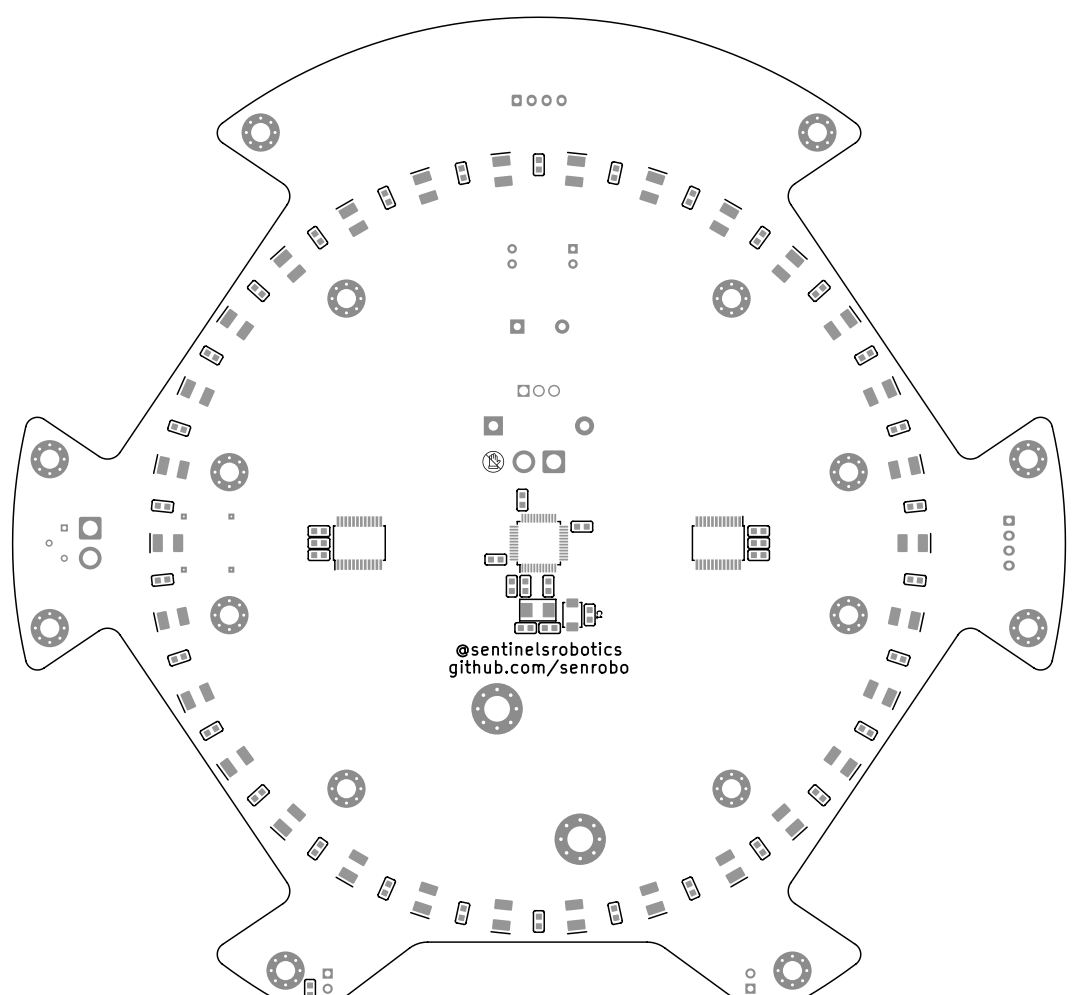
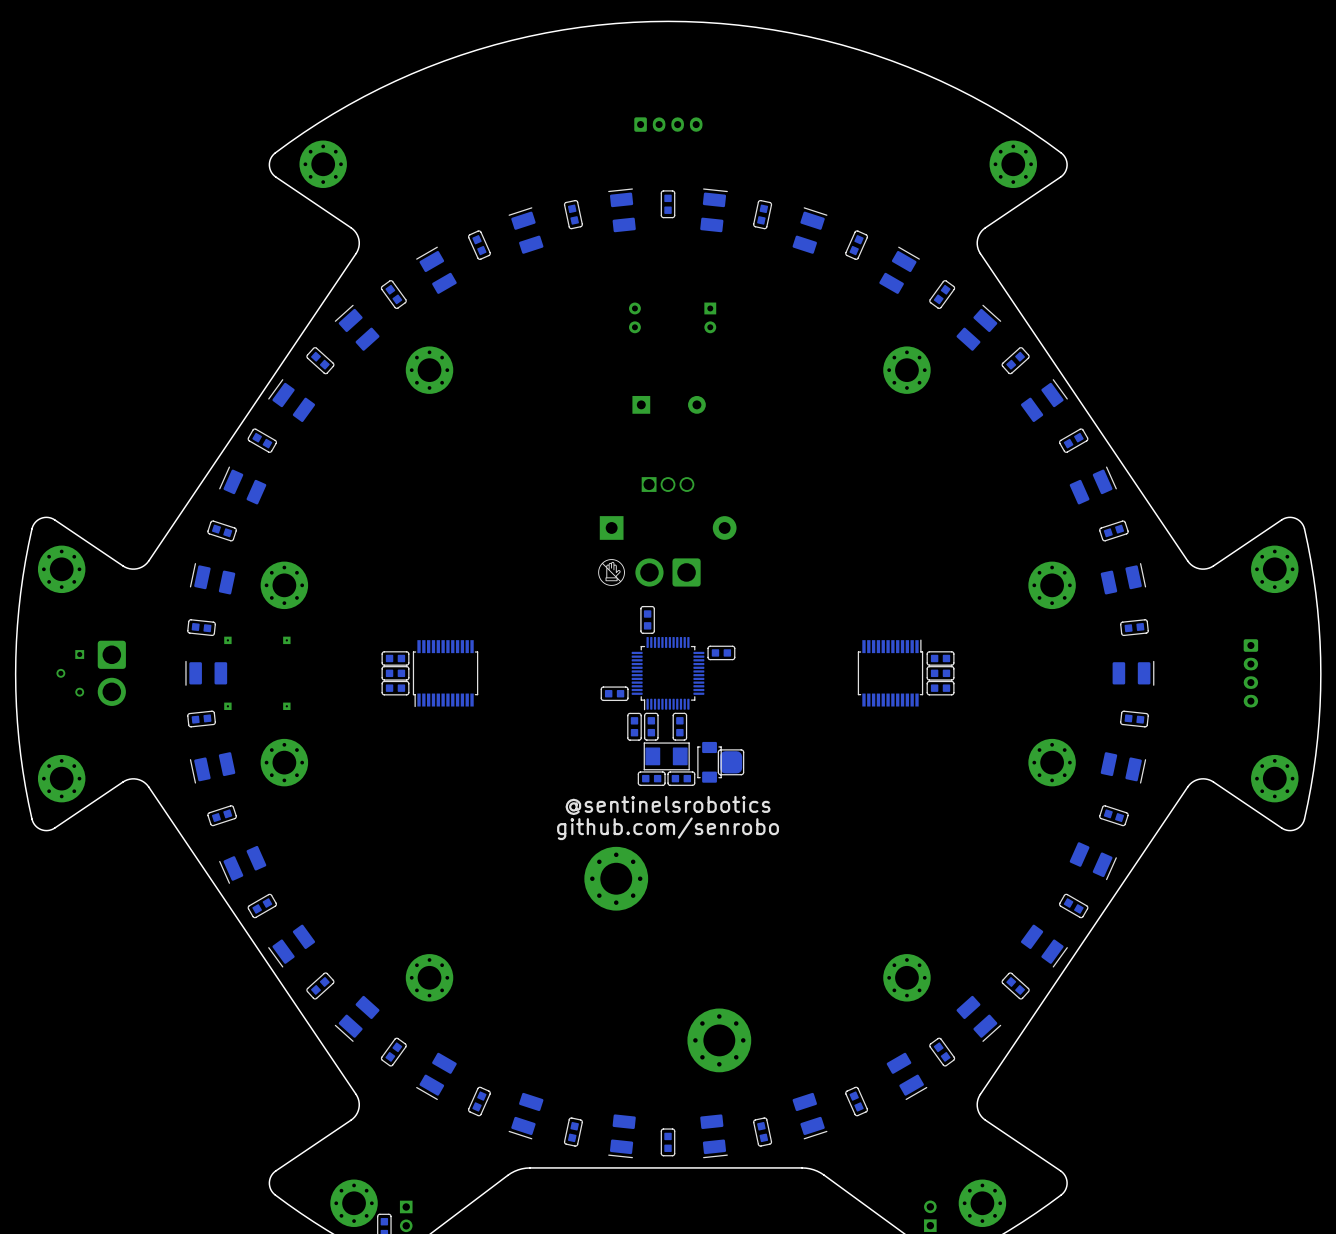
part: (589, 614) -> none
part: none -> (731, 762)

